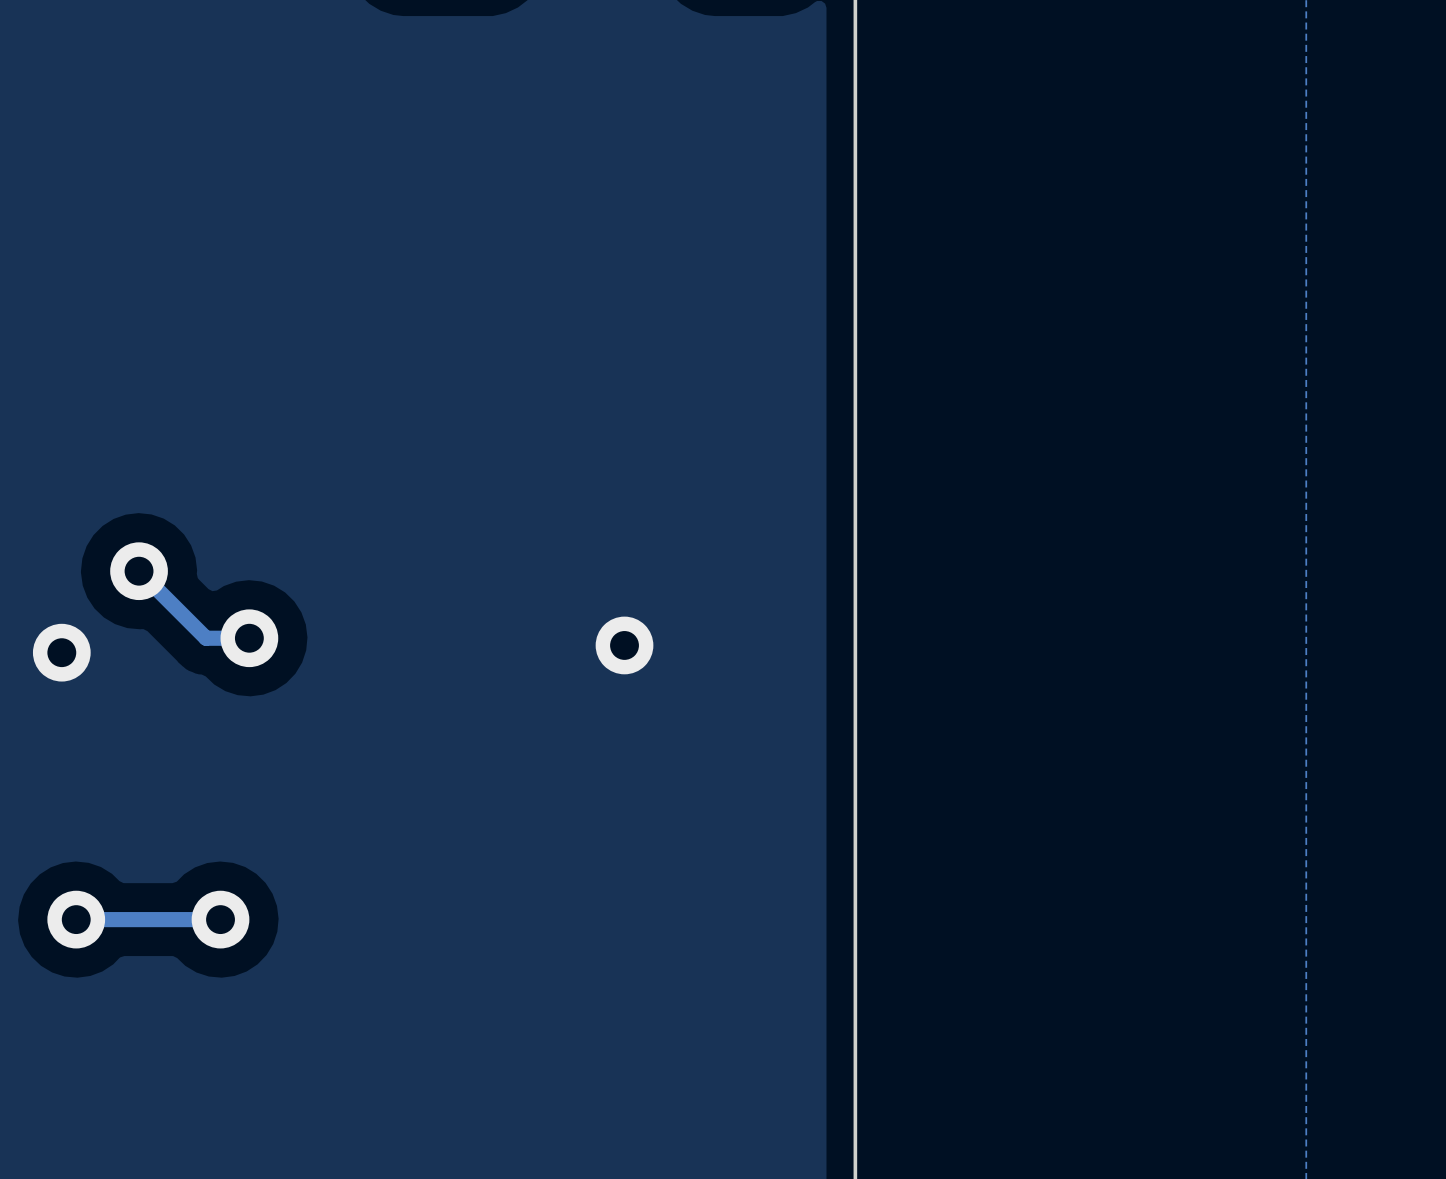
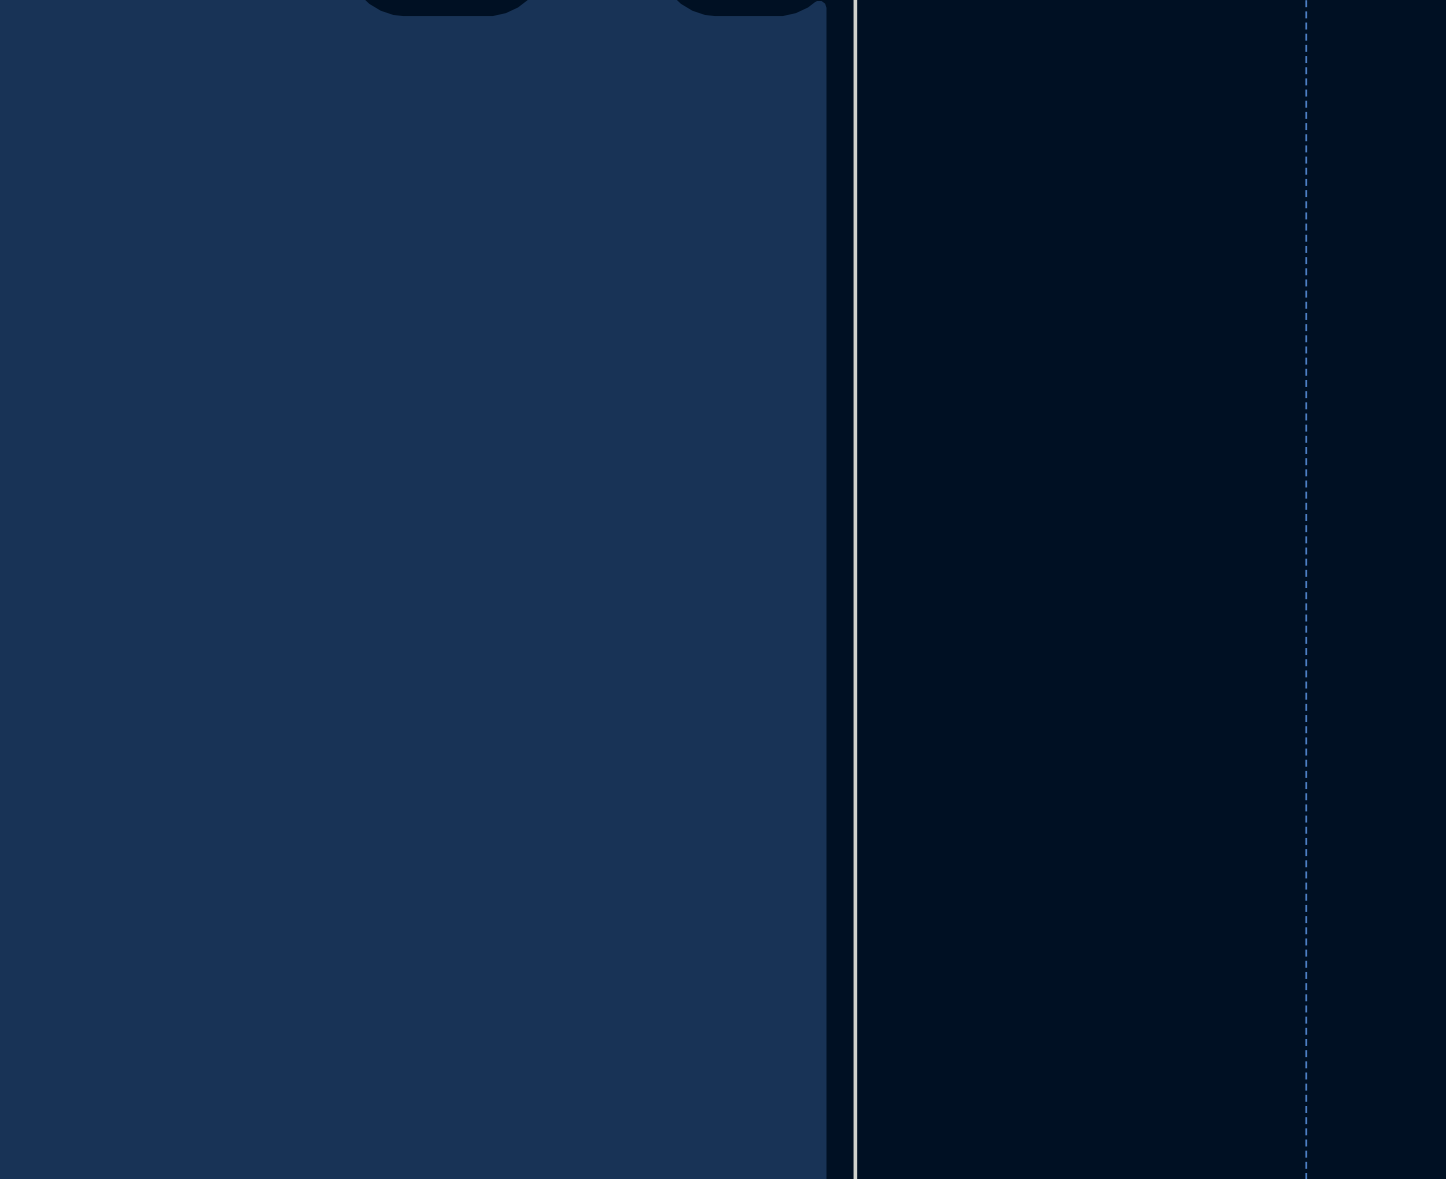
track: (139, 571) (206, 638) (249, 638) -> none
via: (139, 571) -> none
via: (249, 638) -> none
via: (624, 645) -> none
via: (61, 652) -> none
via: (76, 919) -> none
track: (220, 919) (76, 919) -> none
via: (220, 919) -> none

